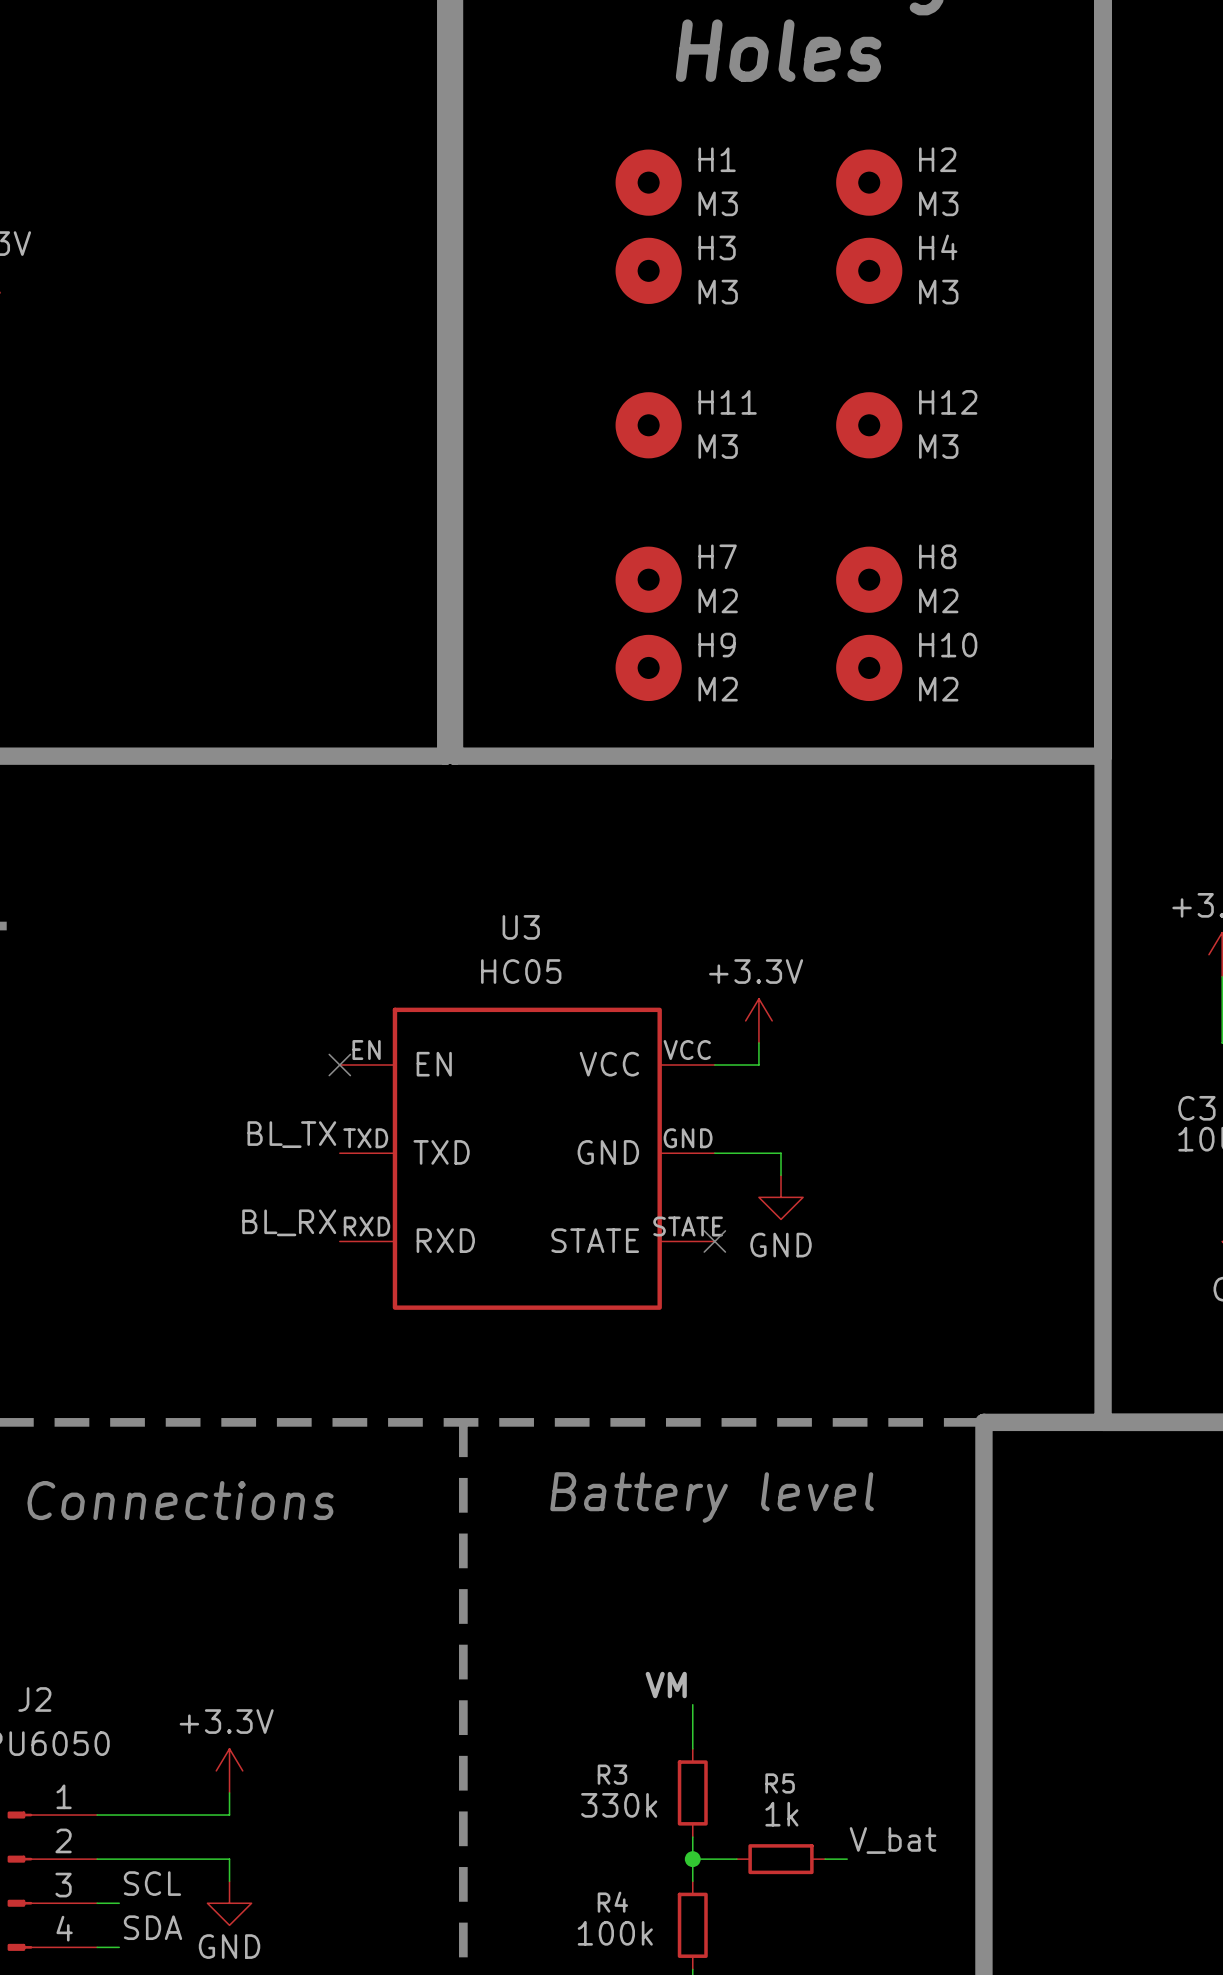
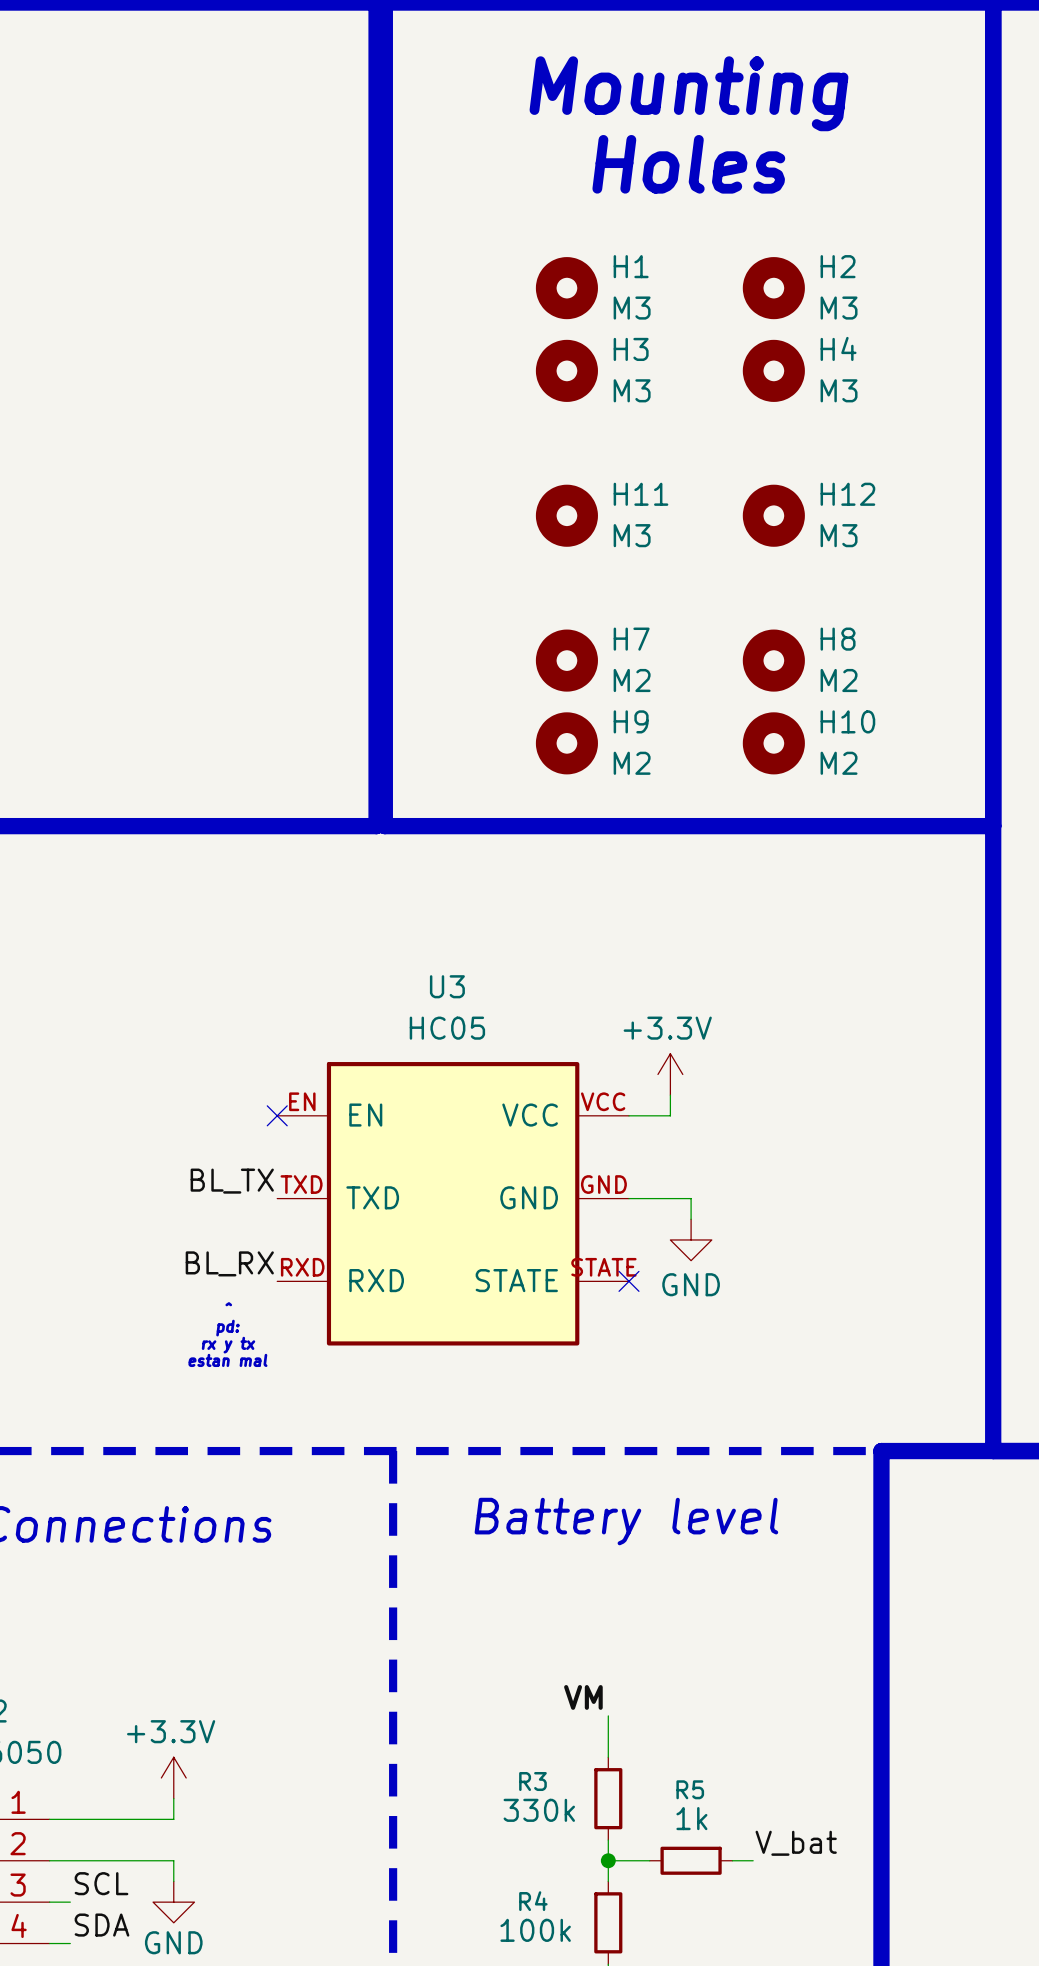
text: none -> ^ (228, 1304)
text: none -> pd: (227, 1328)
text: none -> rx y tx (228, 1345)
text: none -> estan mal (227, 1360)

